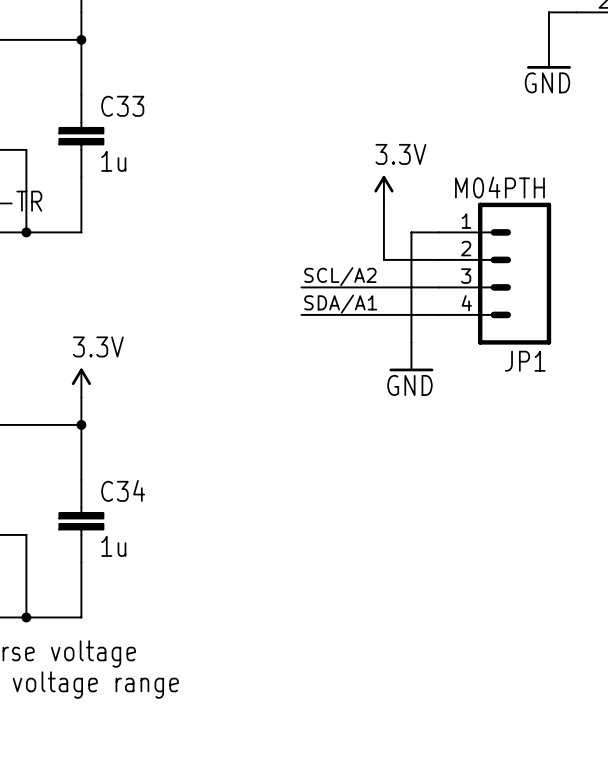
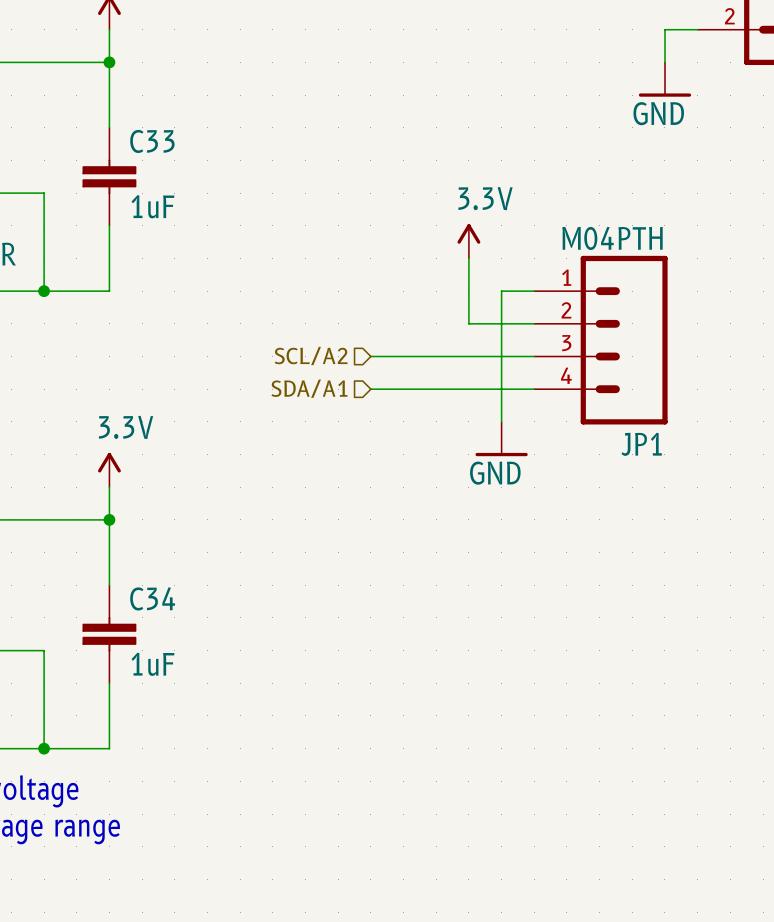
C33 value: 1u (113, 161) -> 1uF (152, 206)
label: SCL/A2 (340, 276) -> none
hierarchical label: none -> SCL/A2 (311, 356)
label: SDA/A1 (340, 304) -> none
hierarchical label: none -> SDA/A1 (309, 388)
C34 value: 1u (113, 546) -> 1uF (152, 664)

